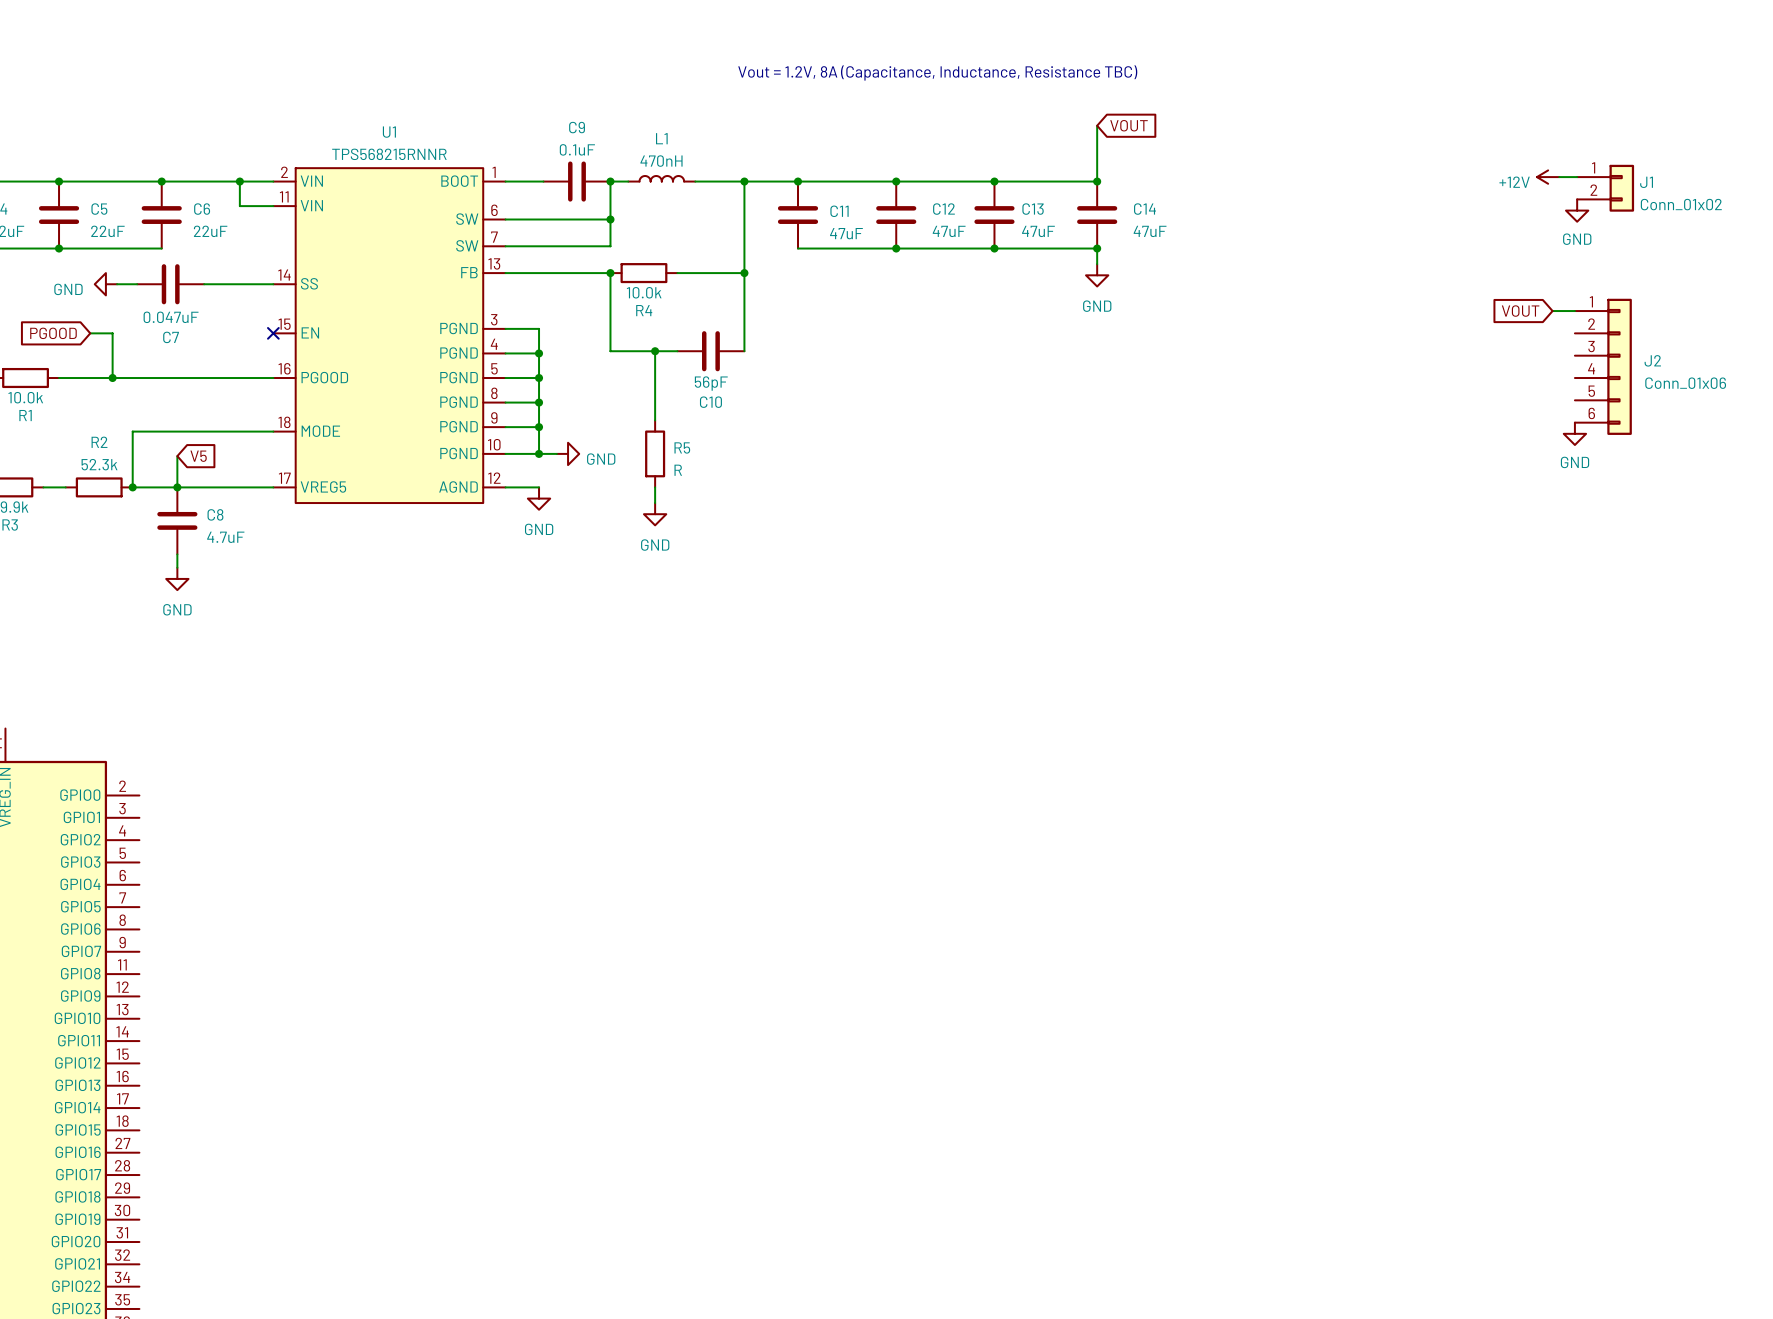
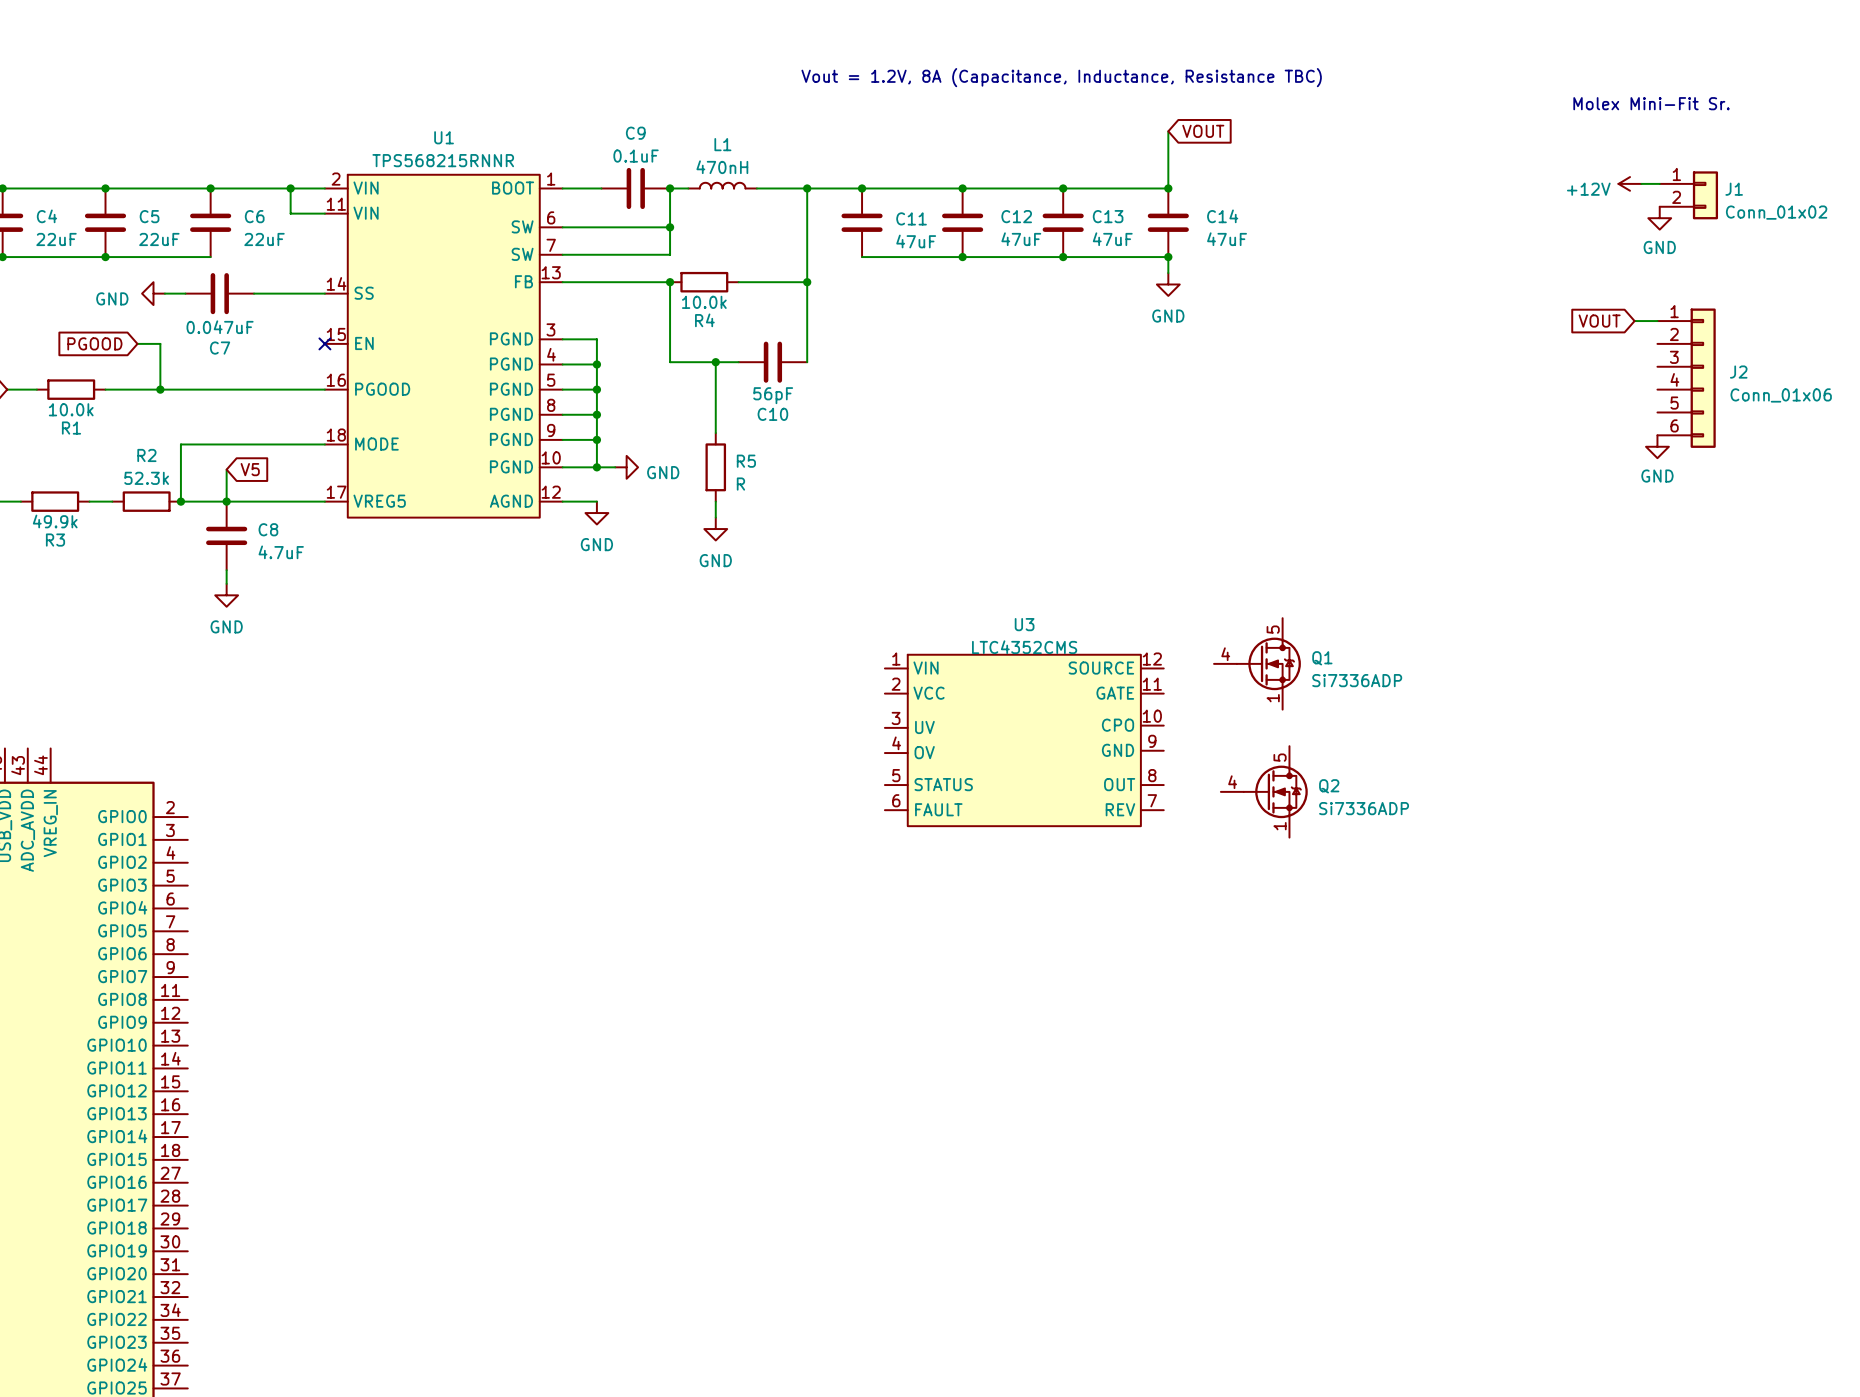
text: none -> Molex Mini-Fit Sr. (1651, 103)
Q1: none -> Si7336ADP (1257, 663)
U3: none -> LTC4352CMS (1024, 740)
Q2: none -> Si7336ADP (1264, 791)

